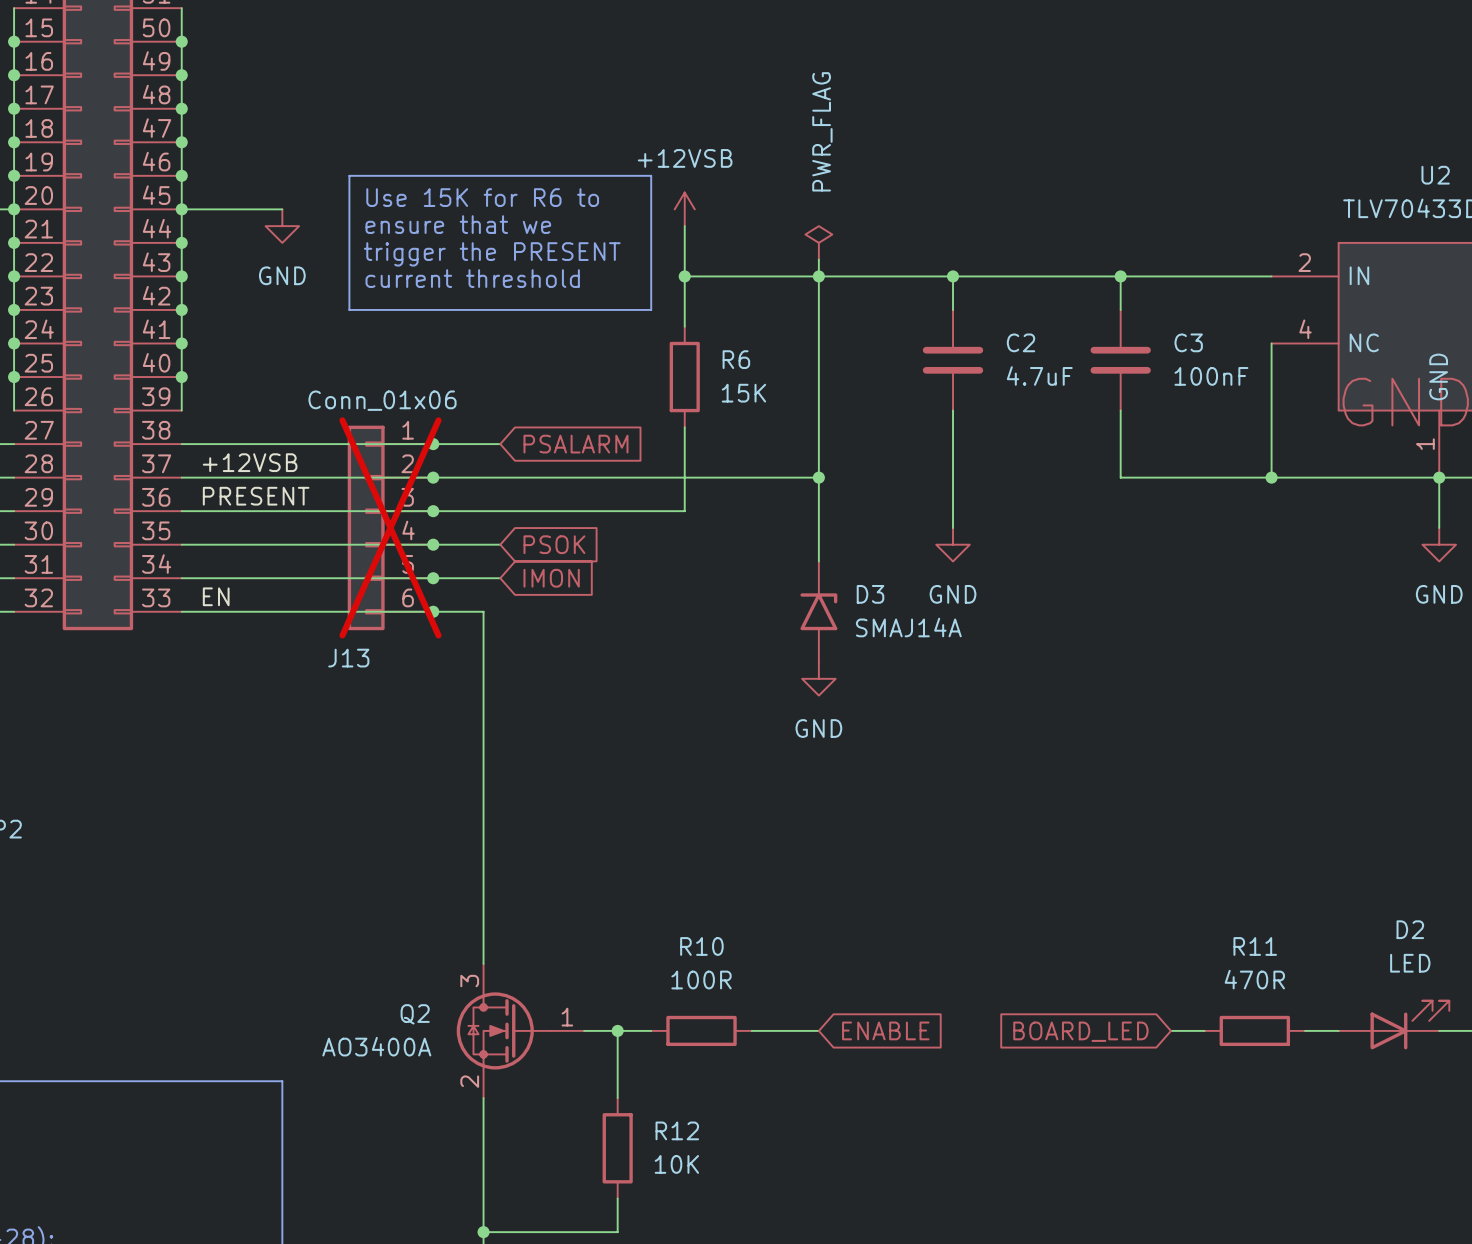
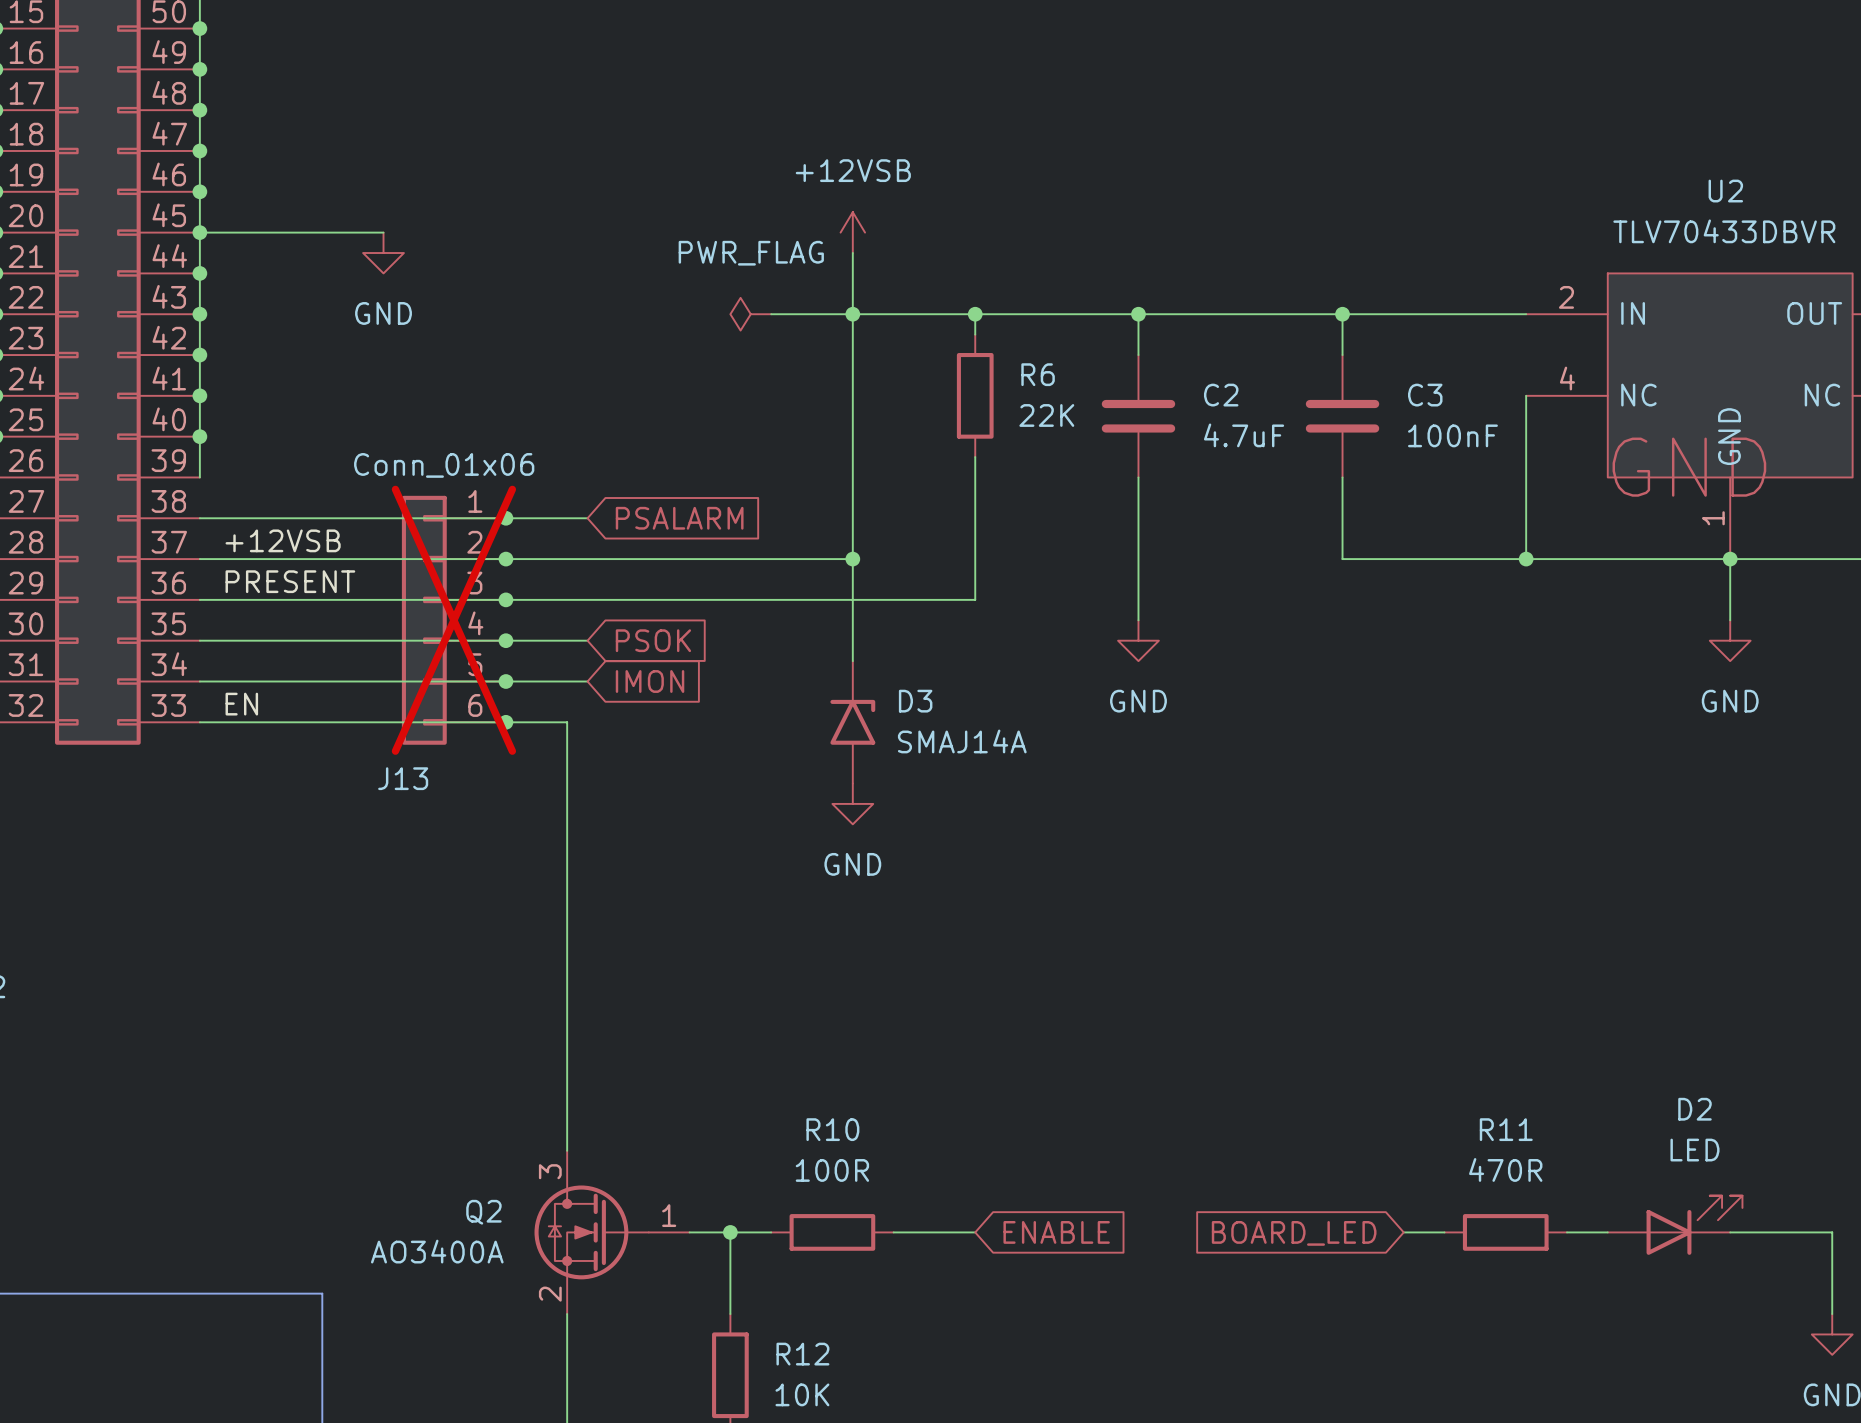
power symbol text position: PWR_FLAG (822, 131) -> PWR_FLAG (751, 253)
line: (349, 175) (651, 175) (651, 309) (349, 309) (349, 175) -> none
text: Use 15K for R6 to (482, 197) -> none
wire: none -> (322, 232) (383, 232)
power symbol position: +12VSB (684, 209) -> +12VSB (852, 232)
text: ensure that we (458, 224) -> none
power symbol position: GND (282, 226) -> GND (383, 253)
wire: (684, 226) (684, 326) -> none
wire: none -> (852, 253) (852, 661)
power symbol rotation: 0° (818, 242) -> 90° counterclockwise (750, 314)
power symbol position: PWR_FLAG (818, 242) -> PWR_FLAG (750, 314)
text: trigger the PRESENT (492, 254) -> none
wire: (818, 259) (818, 276) -> none
wire: none -> (771, 314) (812, 314)
junction position: (684, 276) -> (852, 314)
text: current threshold (472, 278) -> none
wire: (818, 293) (818, 393) -> none
R6 position: (684, 377) -> (975, 395)
R6 value: 15K (743, 393) -> 22K (1046, 415)
wire: (684, 427) (684, 511) -> none
wire: (718, 477) (818, 477) -> none
junction: none -> (852, 559)
junction: (818, 477) -> none
wire: (818, 511) (818, 561) -> (975, 599) (812, 599)
D3 position: (818, 611) -> (852, 722)
power symbol position: GND (818, 678) -> GND (852, 803)

